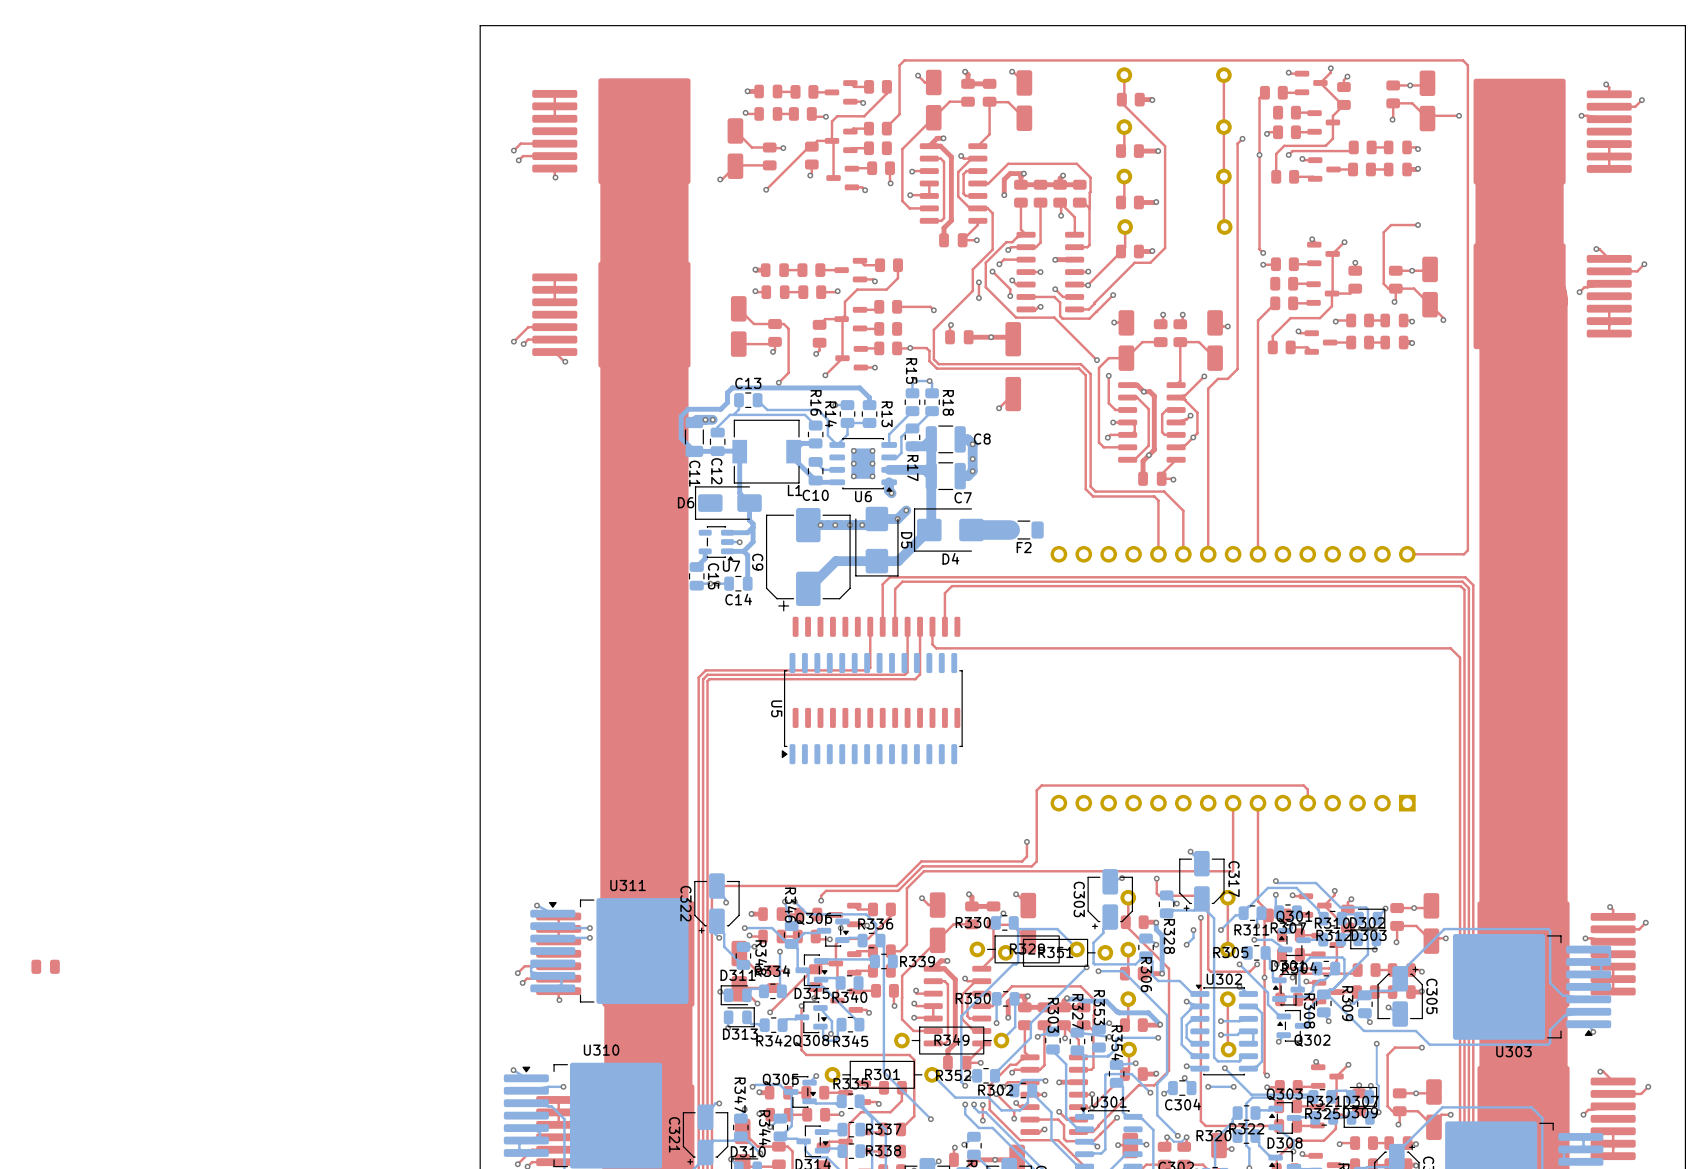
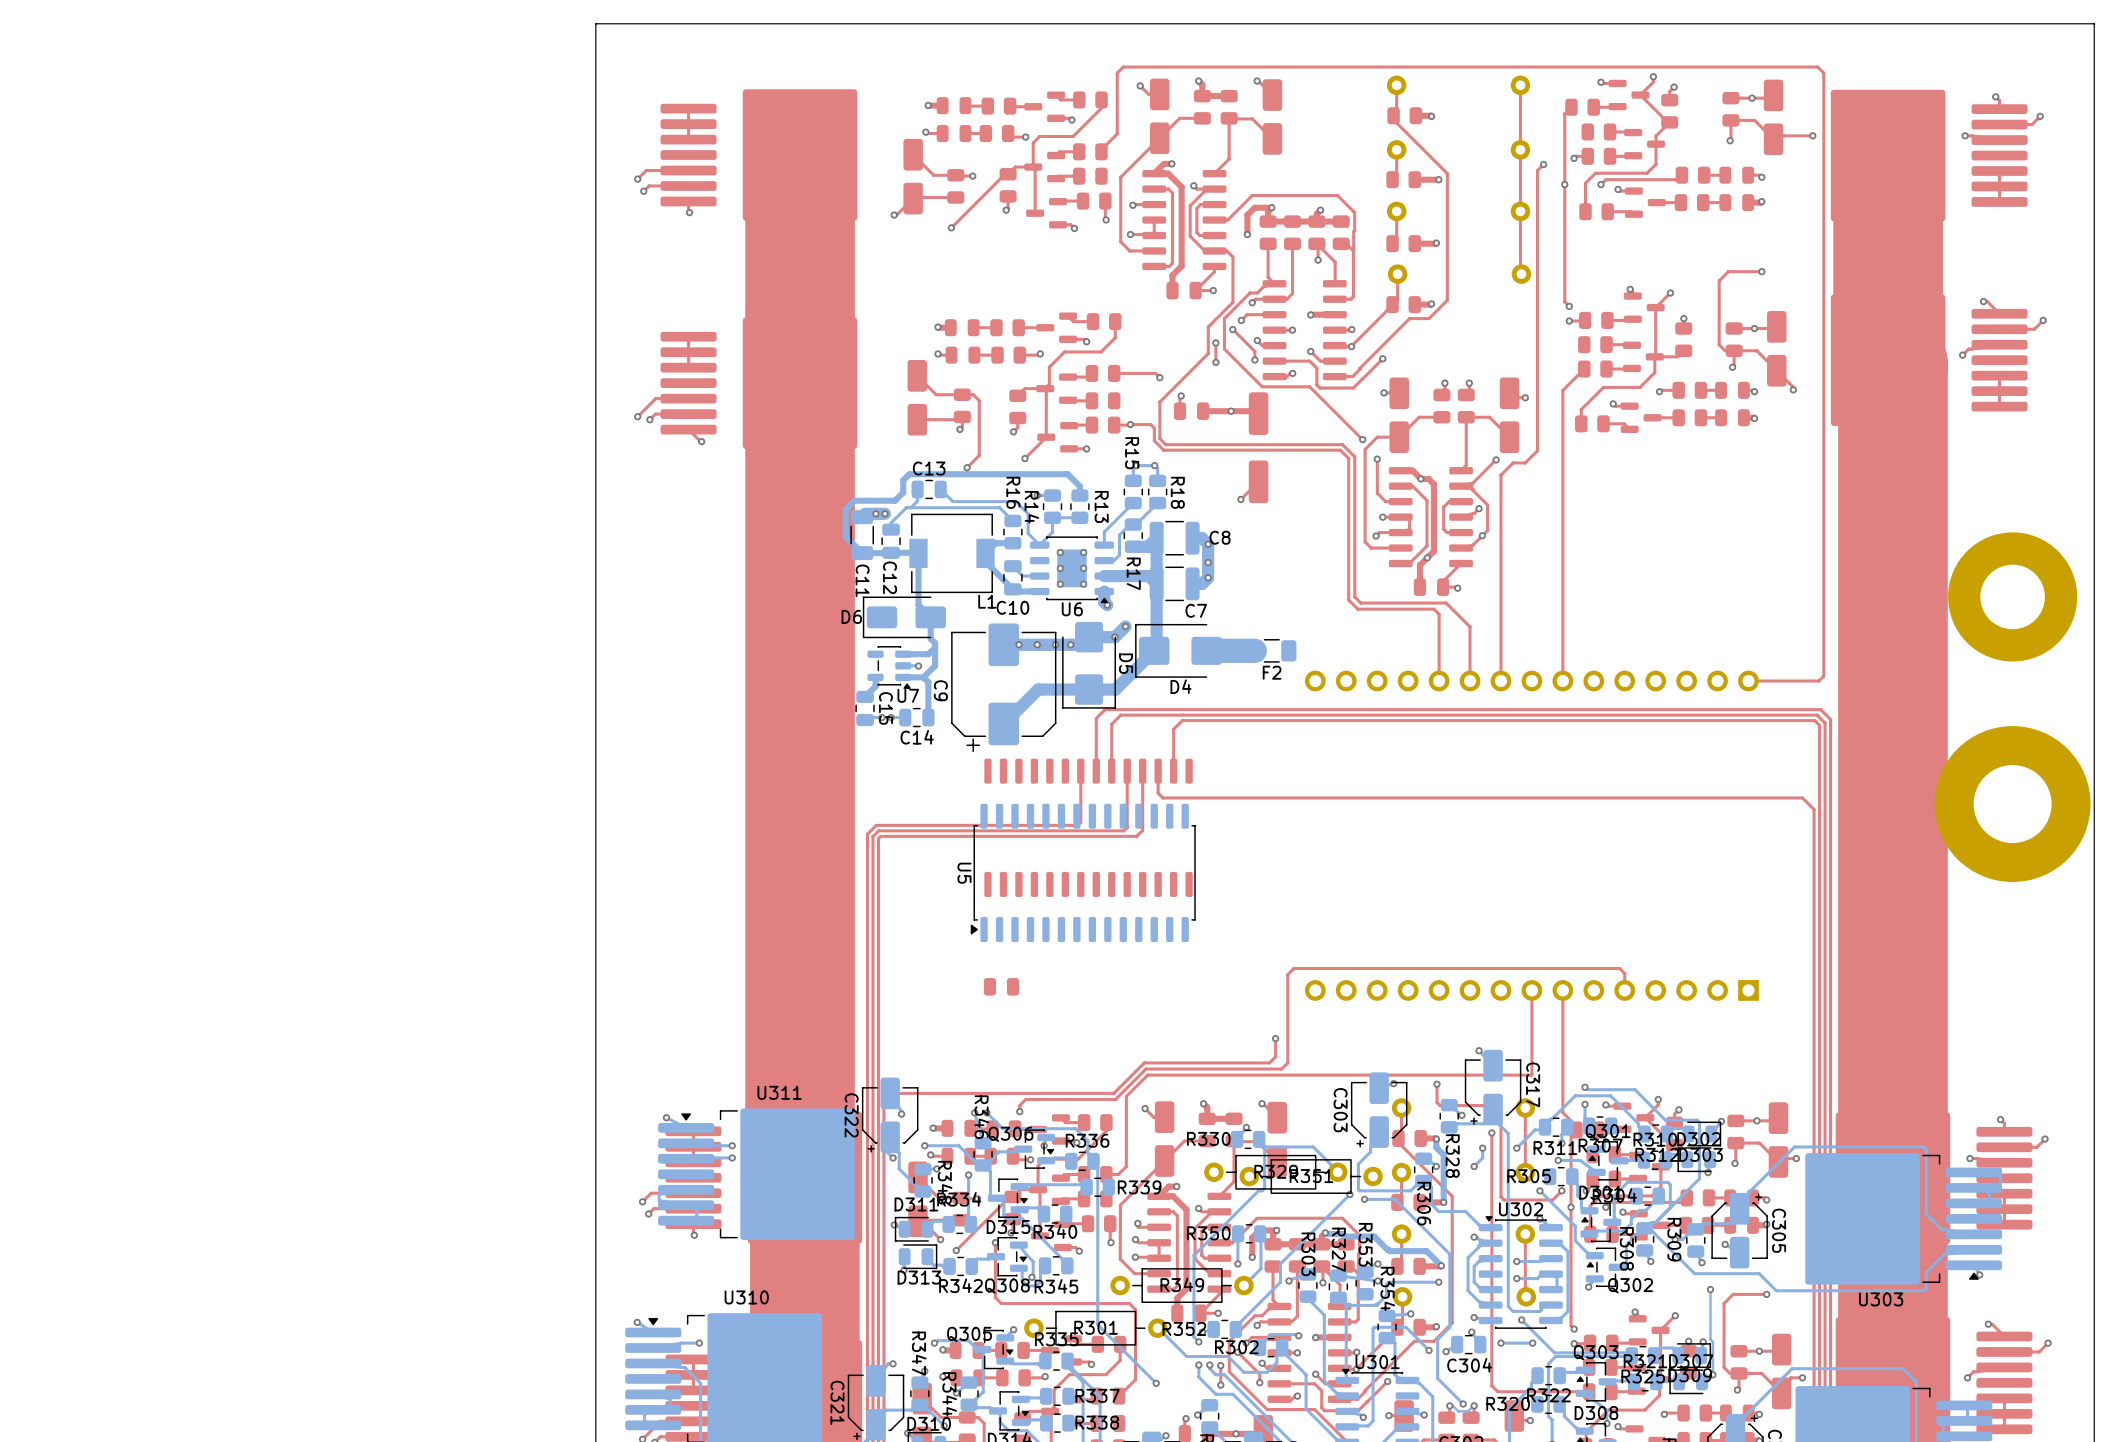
part: none -> (2012, 596)
part: none -> (2012, 804)
part: none -> (1001, 986)
part: (45, 966) -> none

